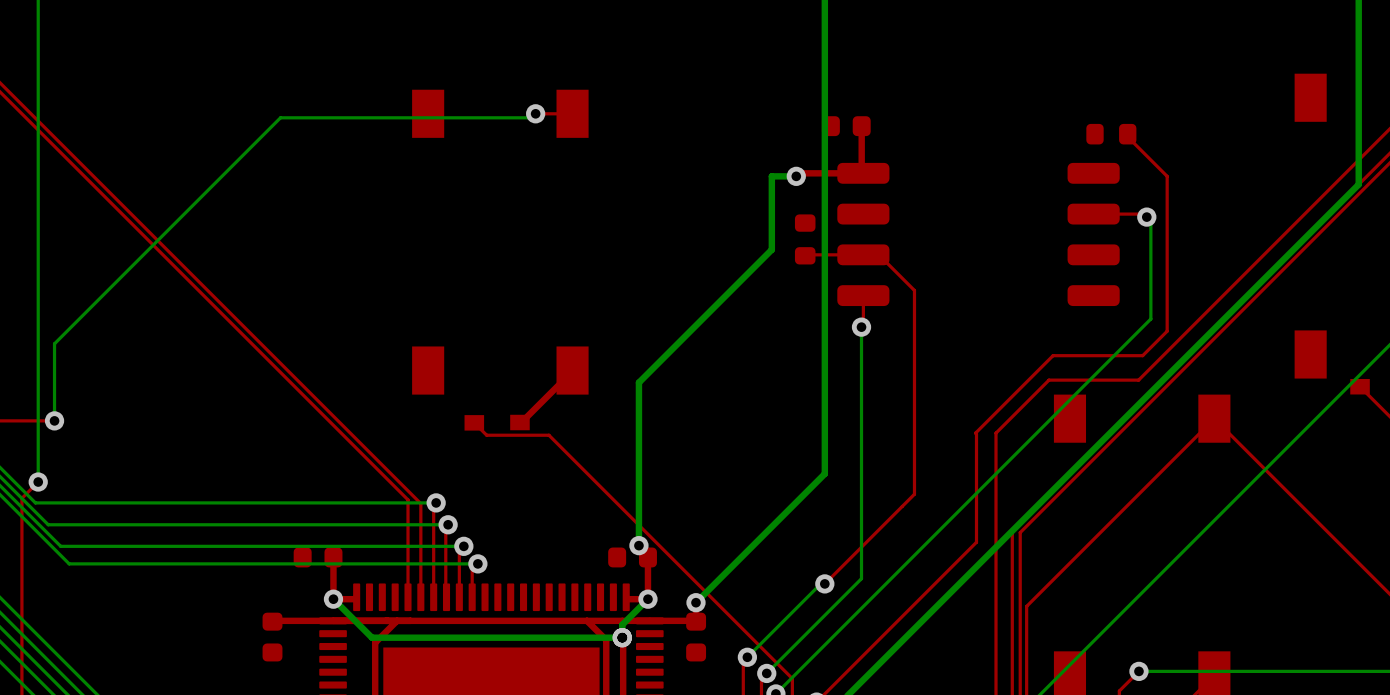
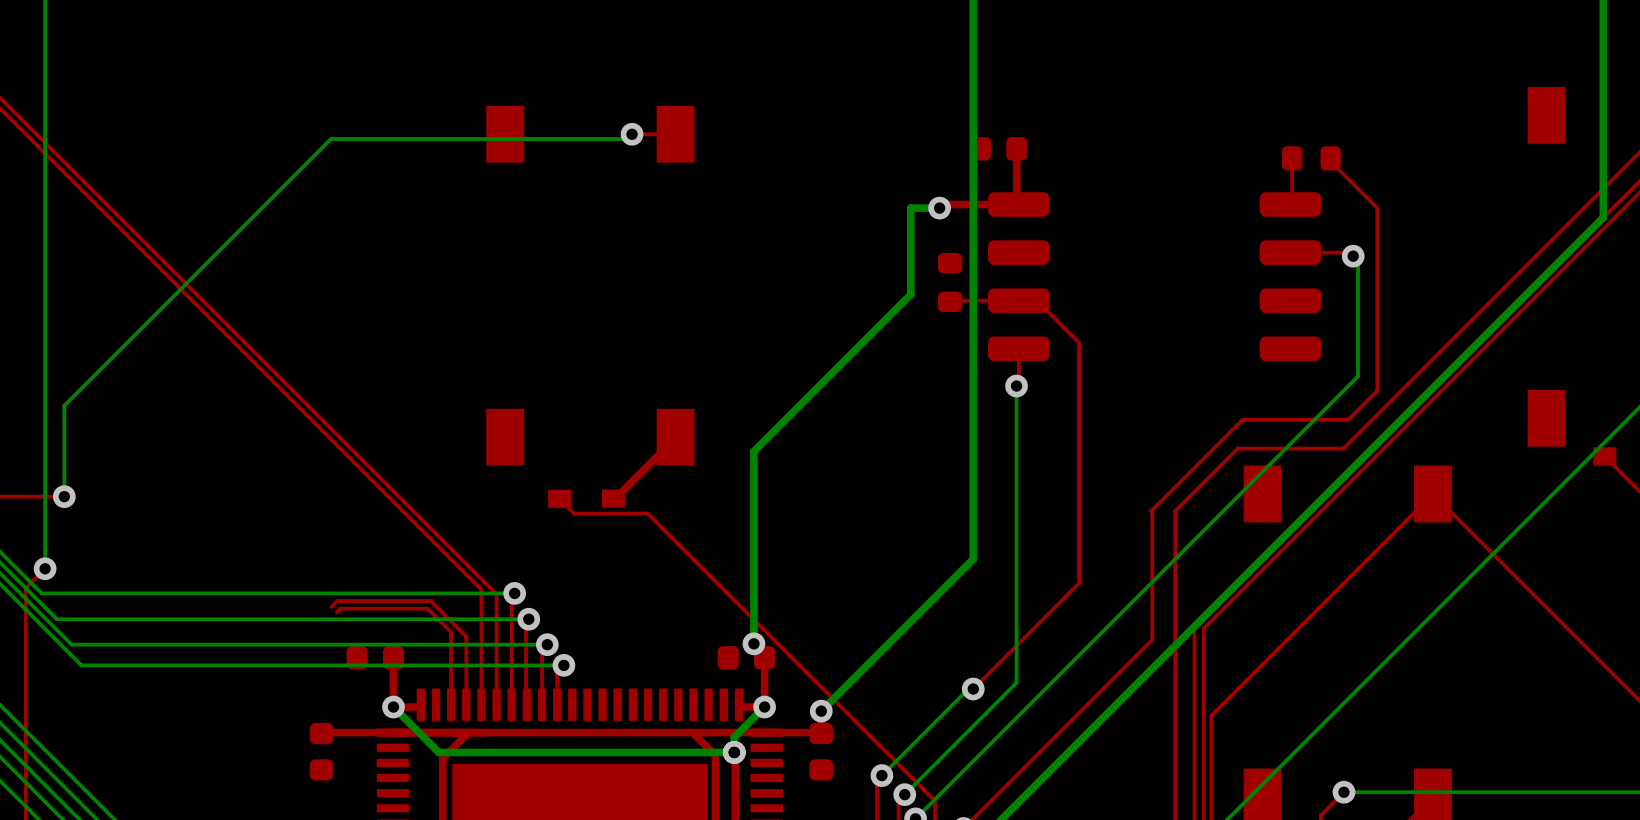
top track: none -> (1292, 158) (1292, 202) (1290, 204)
top track: none -> (331, 607) (337, 601) (430, 601) (466, 636) (466, 704)
top track: none -> (336, 612) (340, 608) (427, 608) (451, 632) (451, 704)

